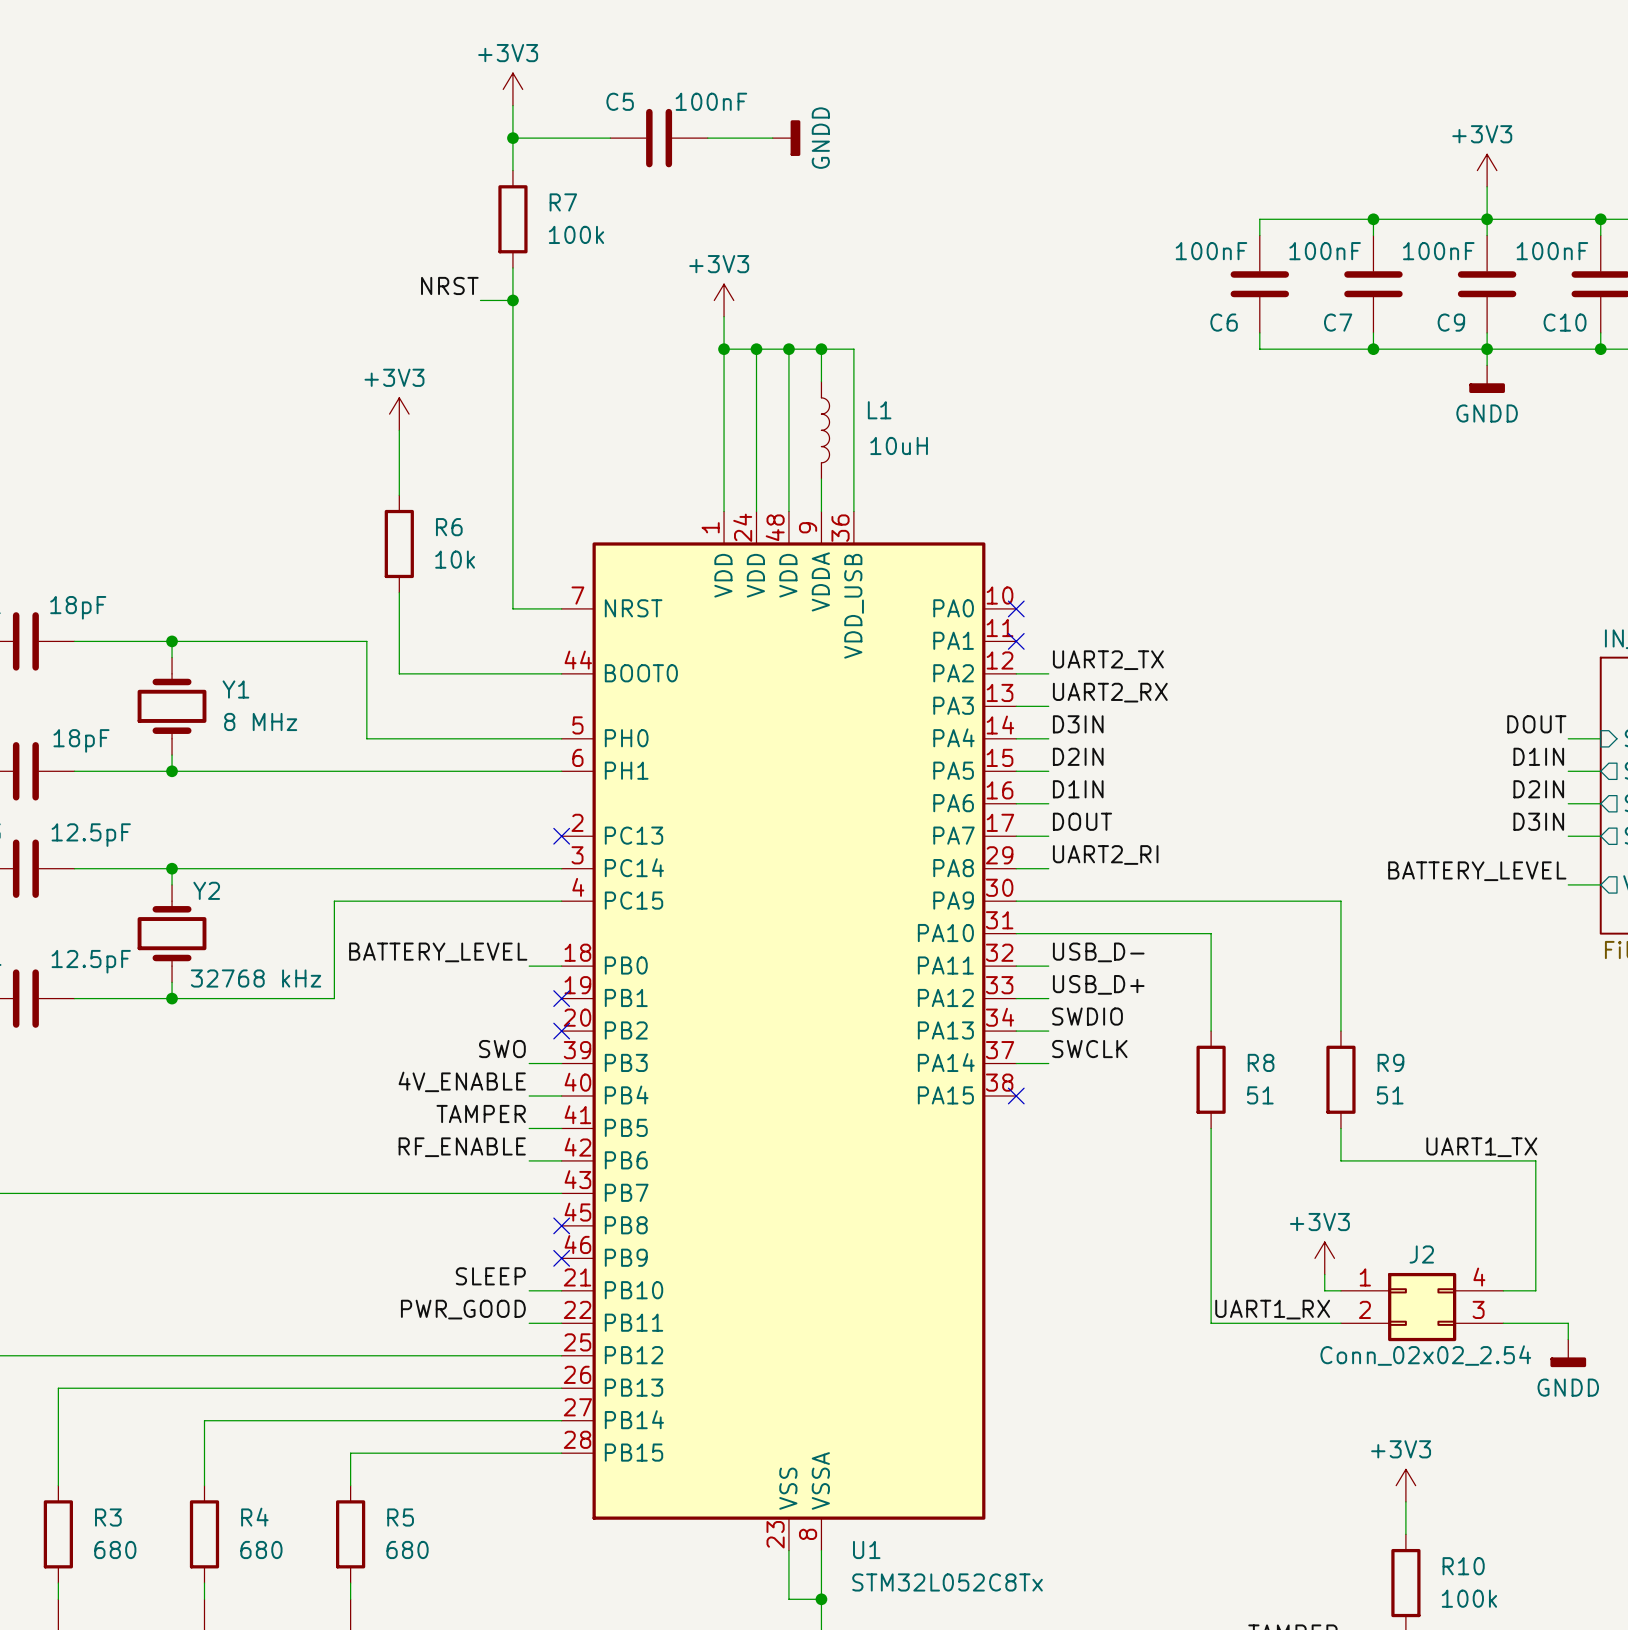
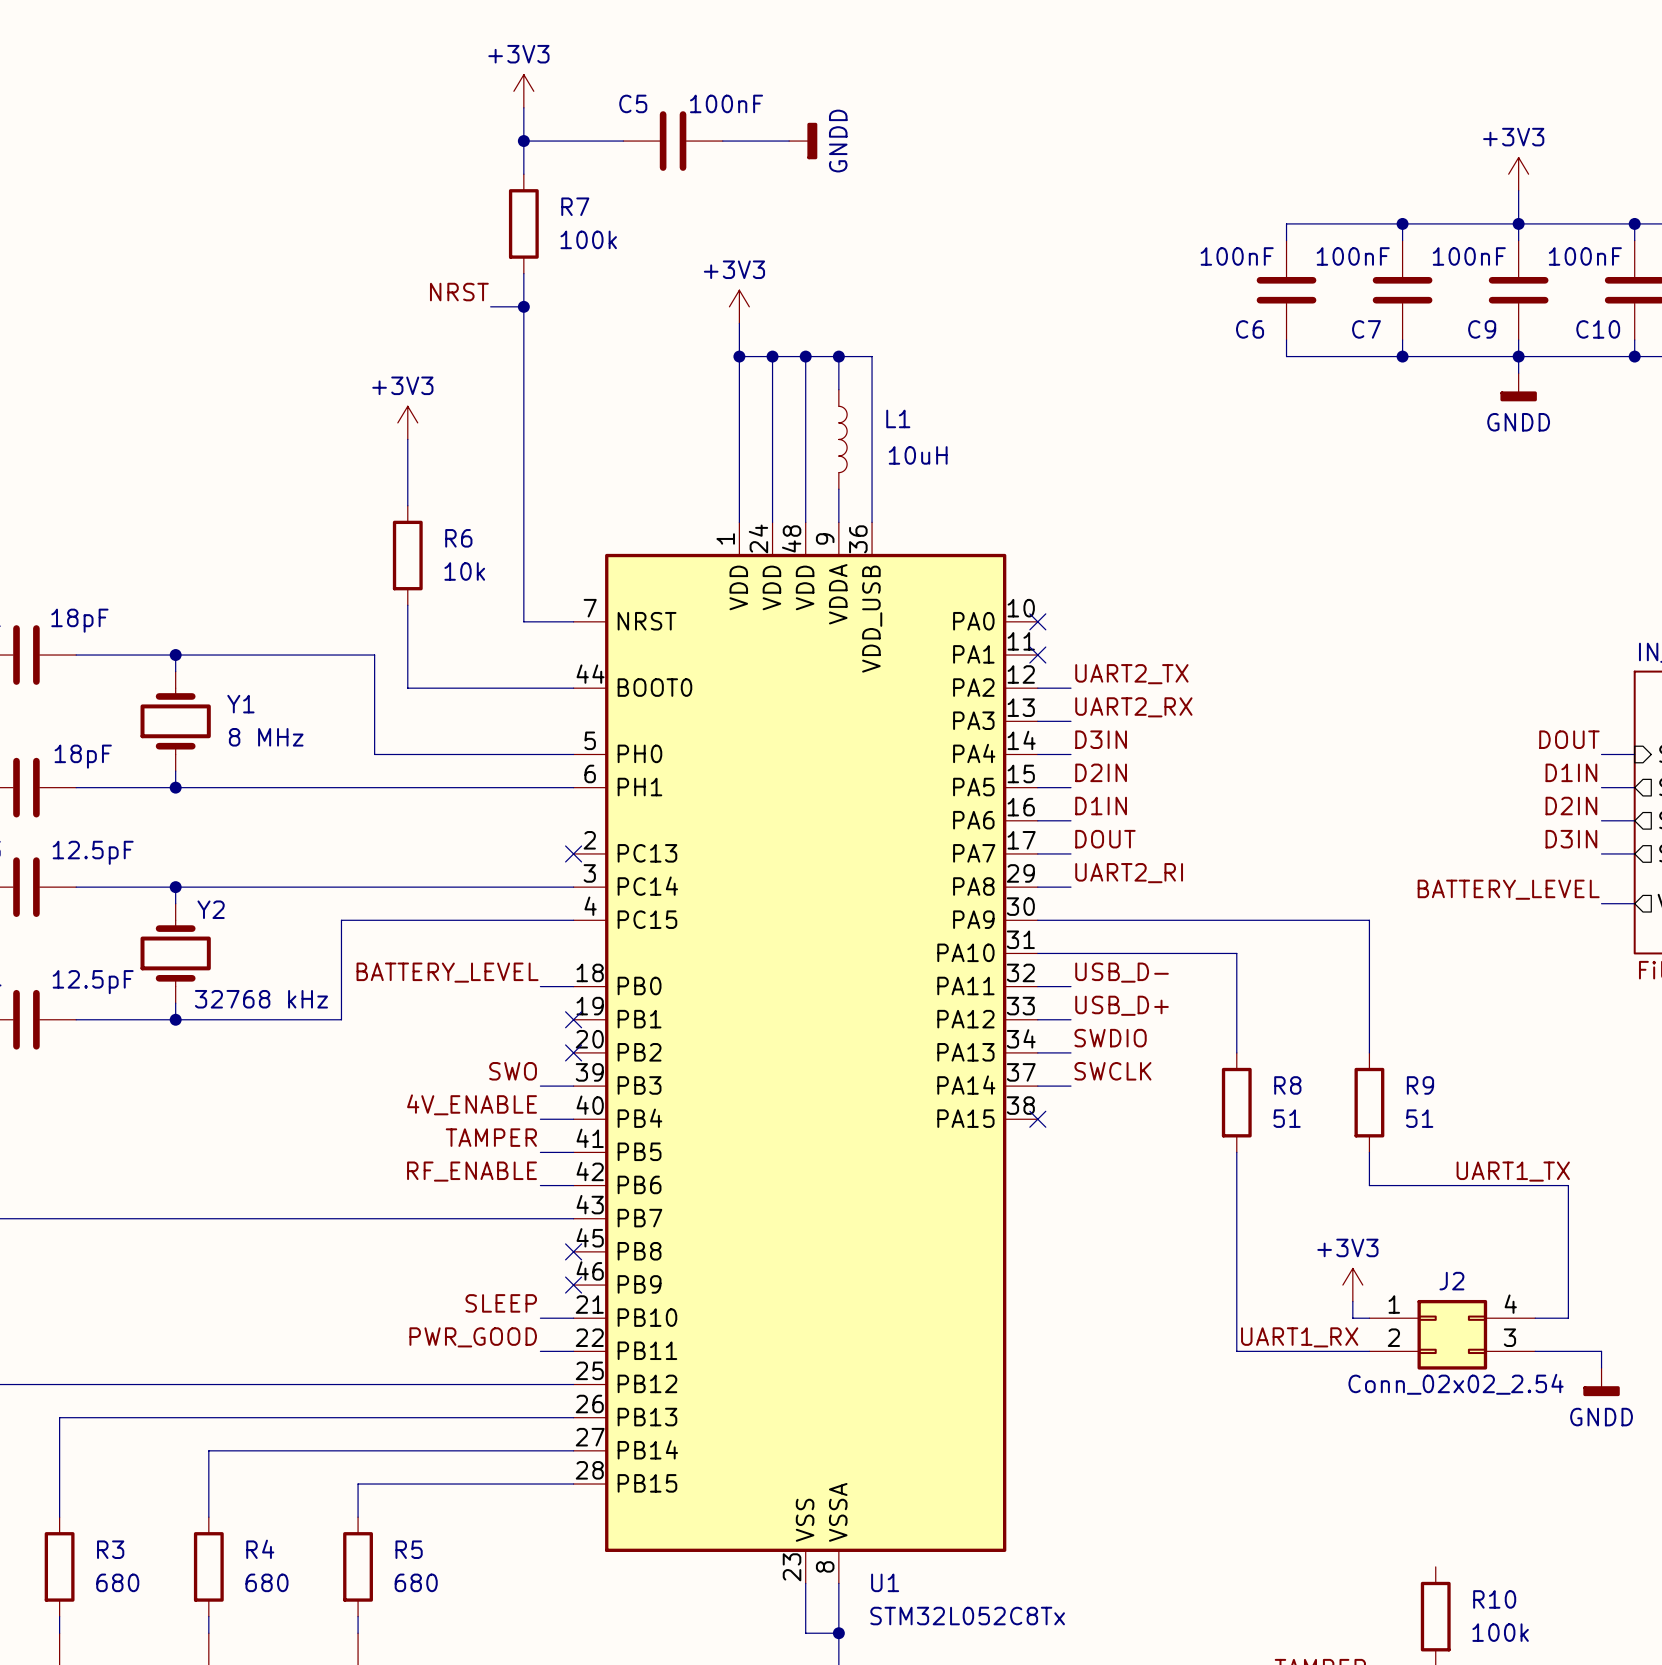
power symbol: +3V3 (1405, 1485) -> none
wire: (1405, 1501) (1405, 1534) -> none

